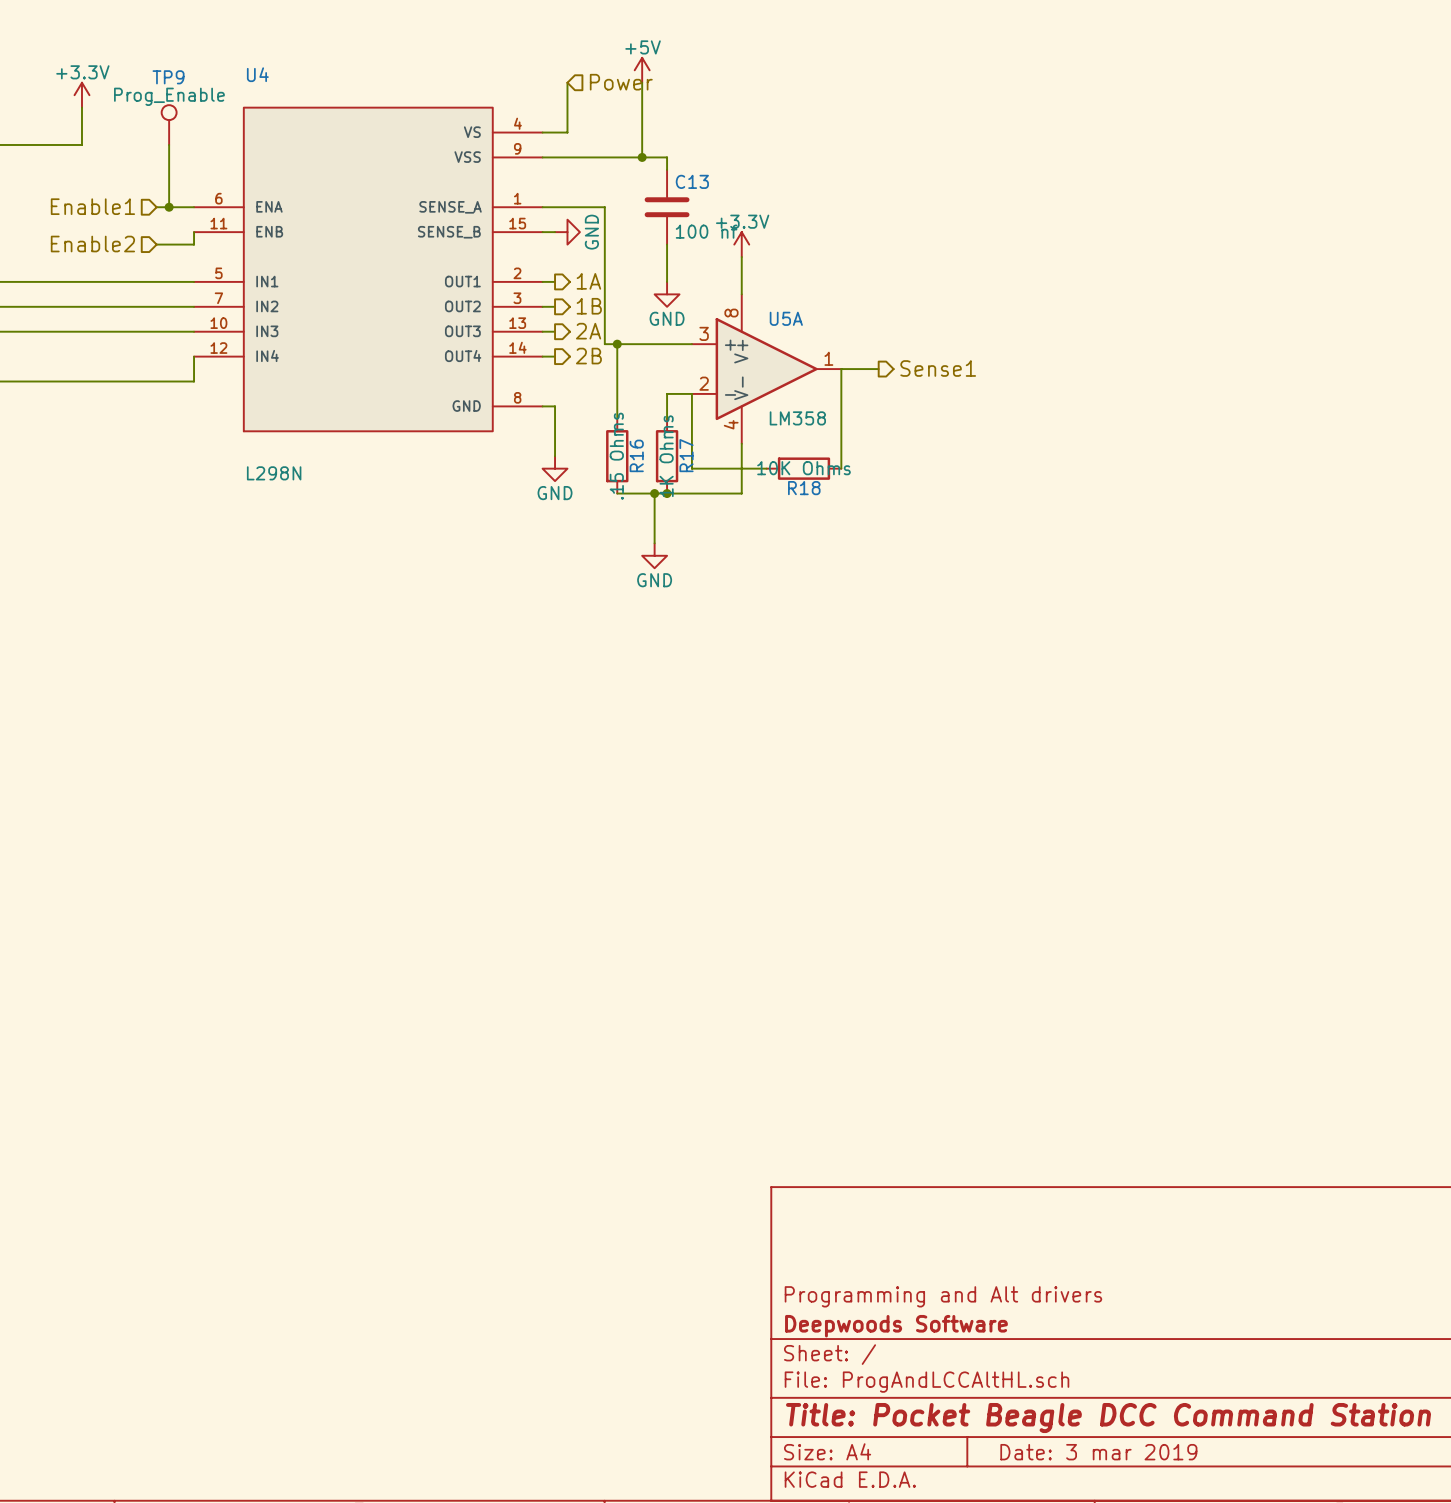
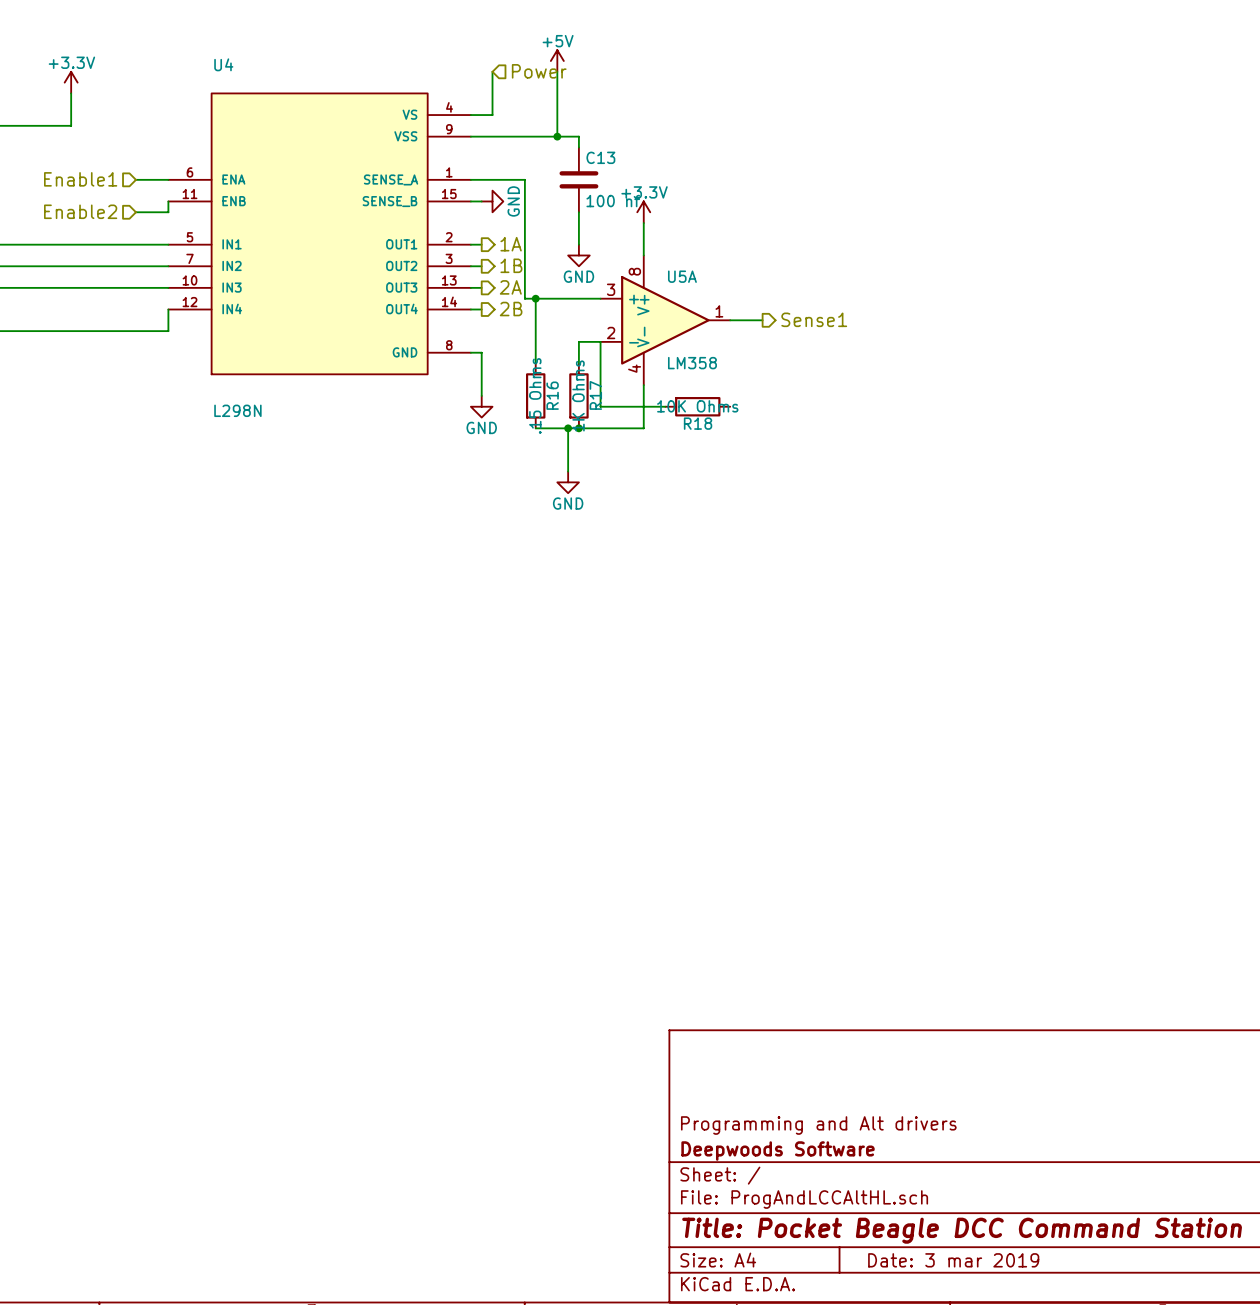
TP9: Prog_Enable (169, 125) -> none
wire: (169, 144) (169, 207) -> none
junction: (169, 207) -> none
wire: (841, 369) (841, 468) -> none

